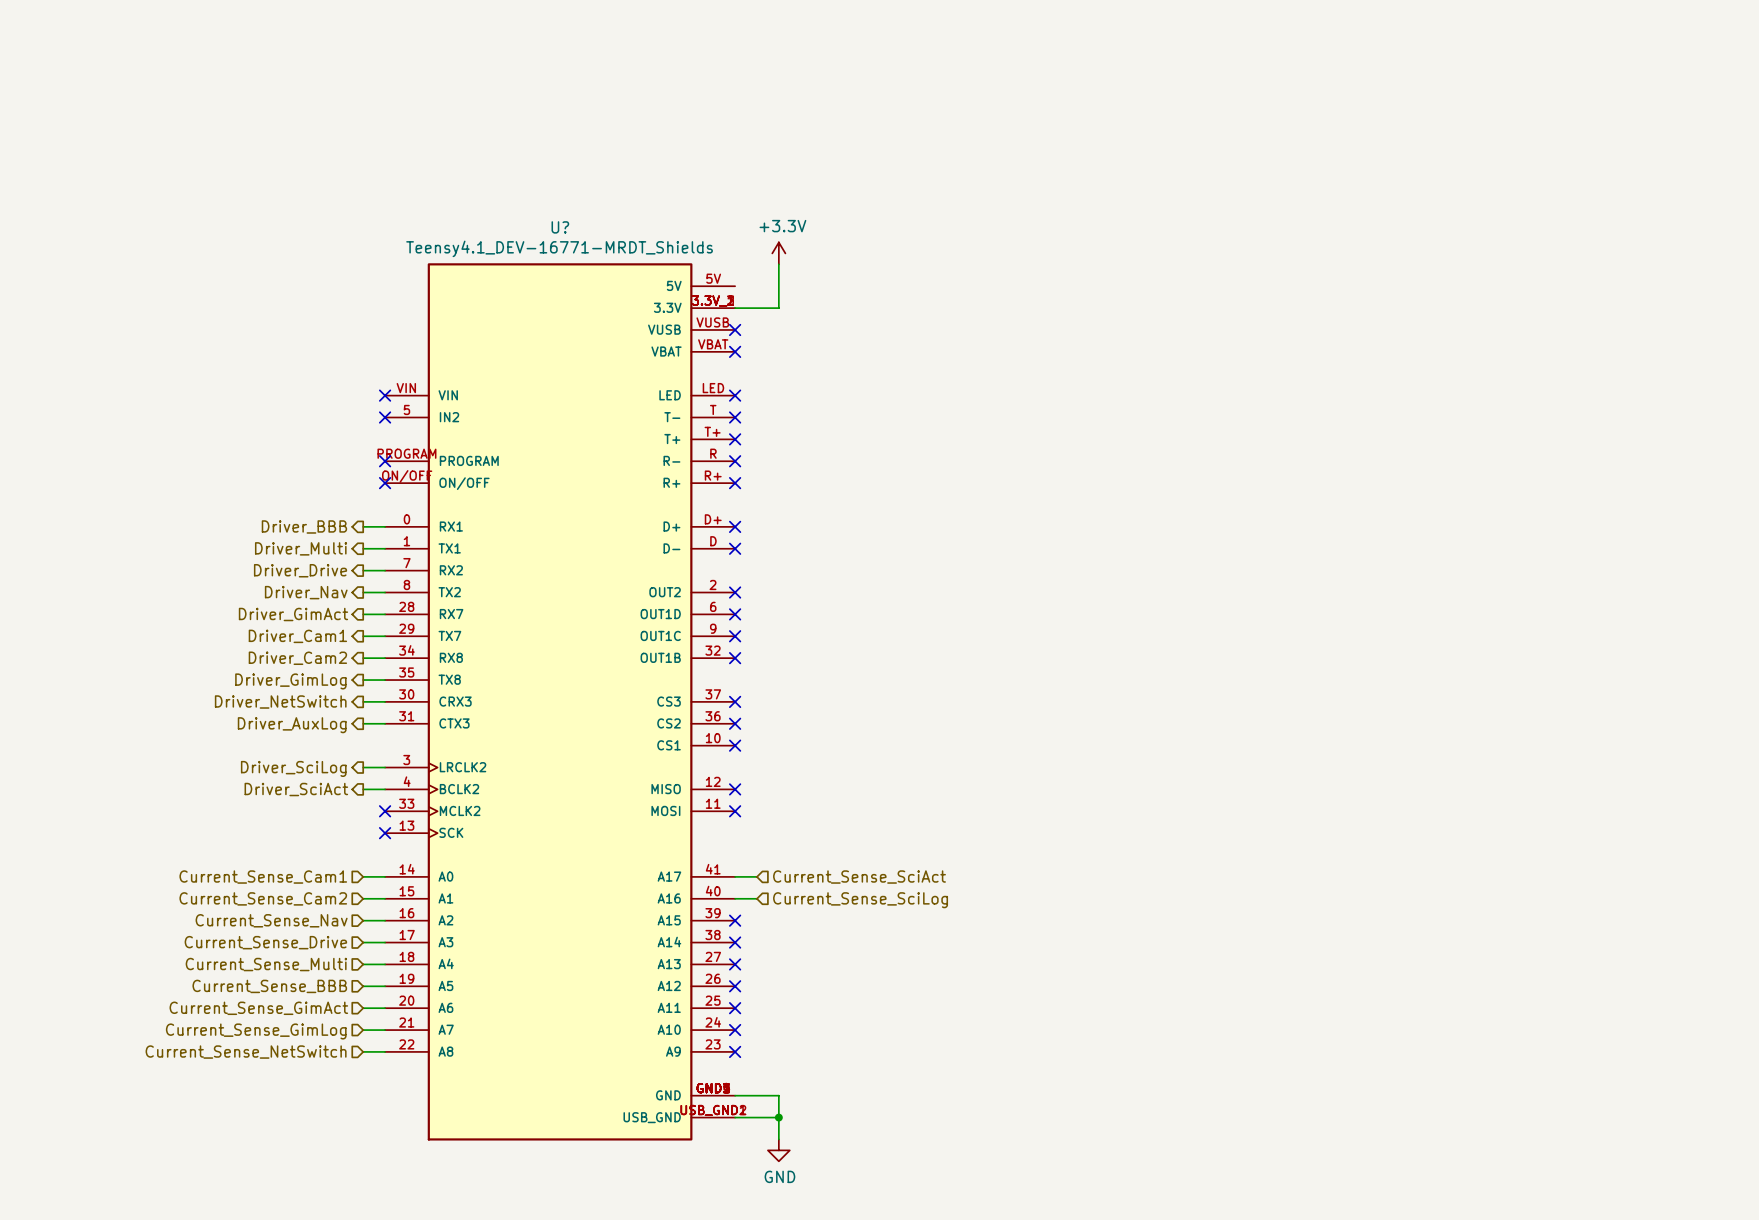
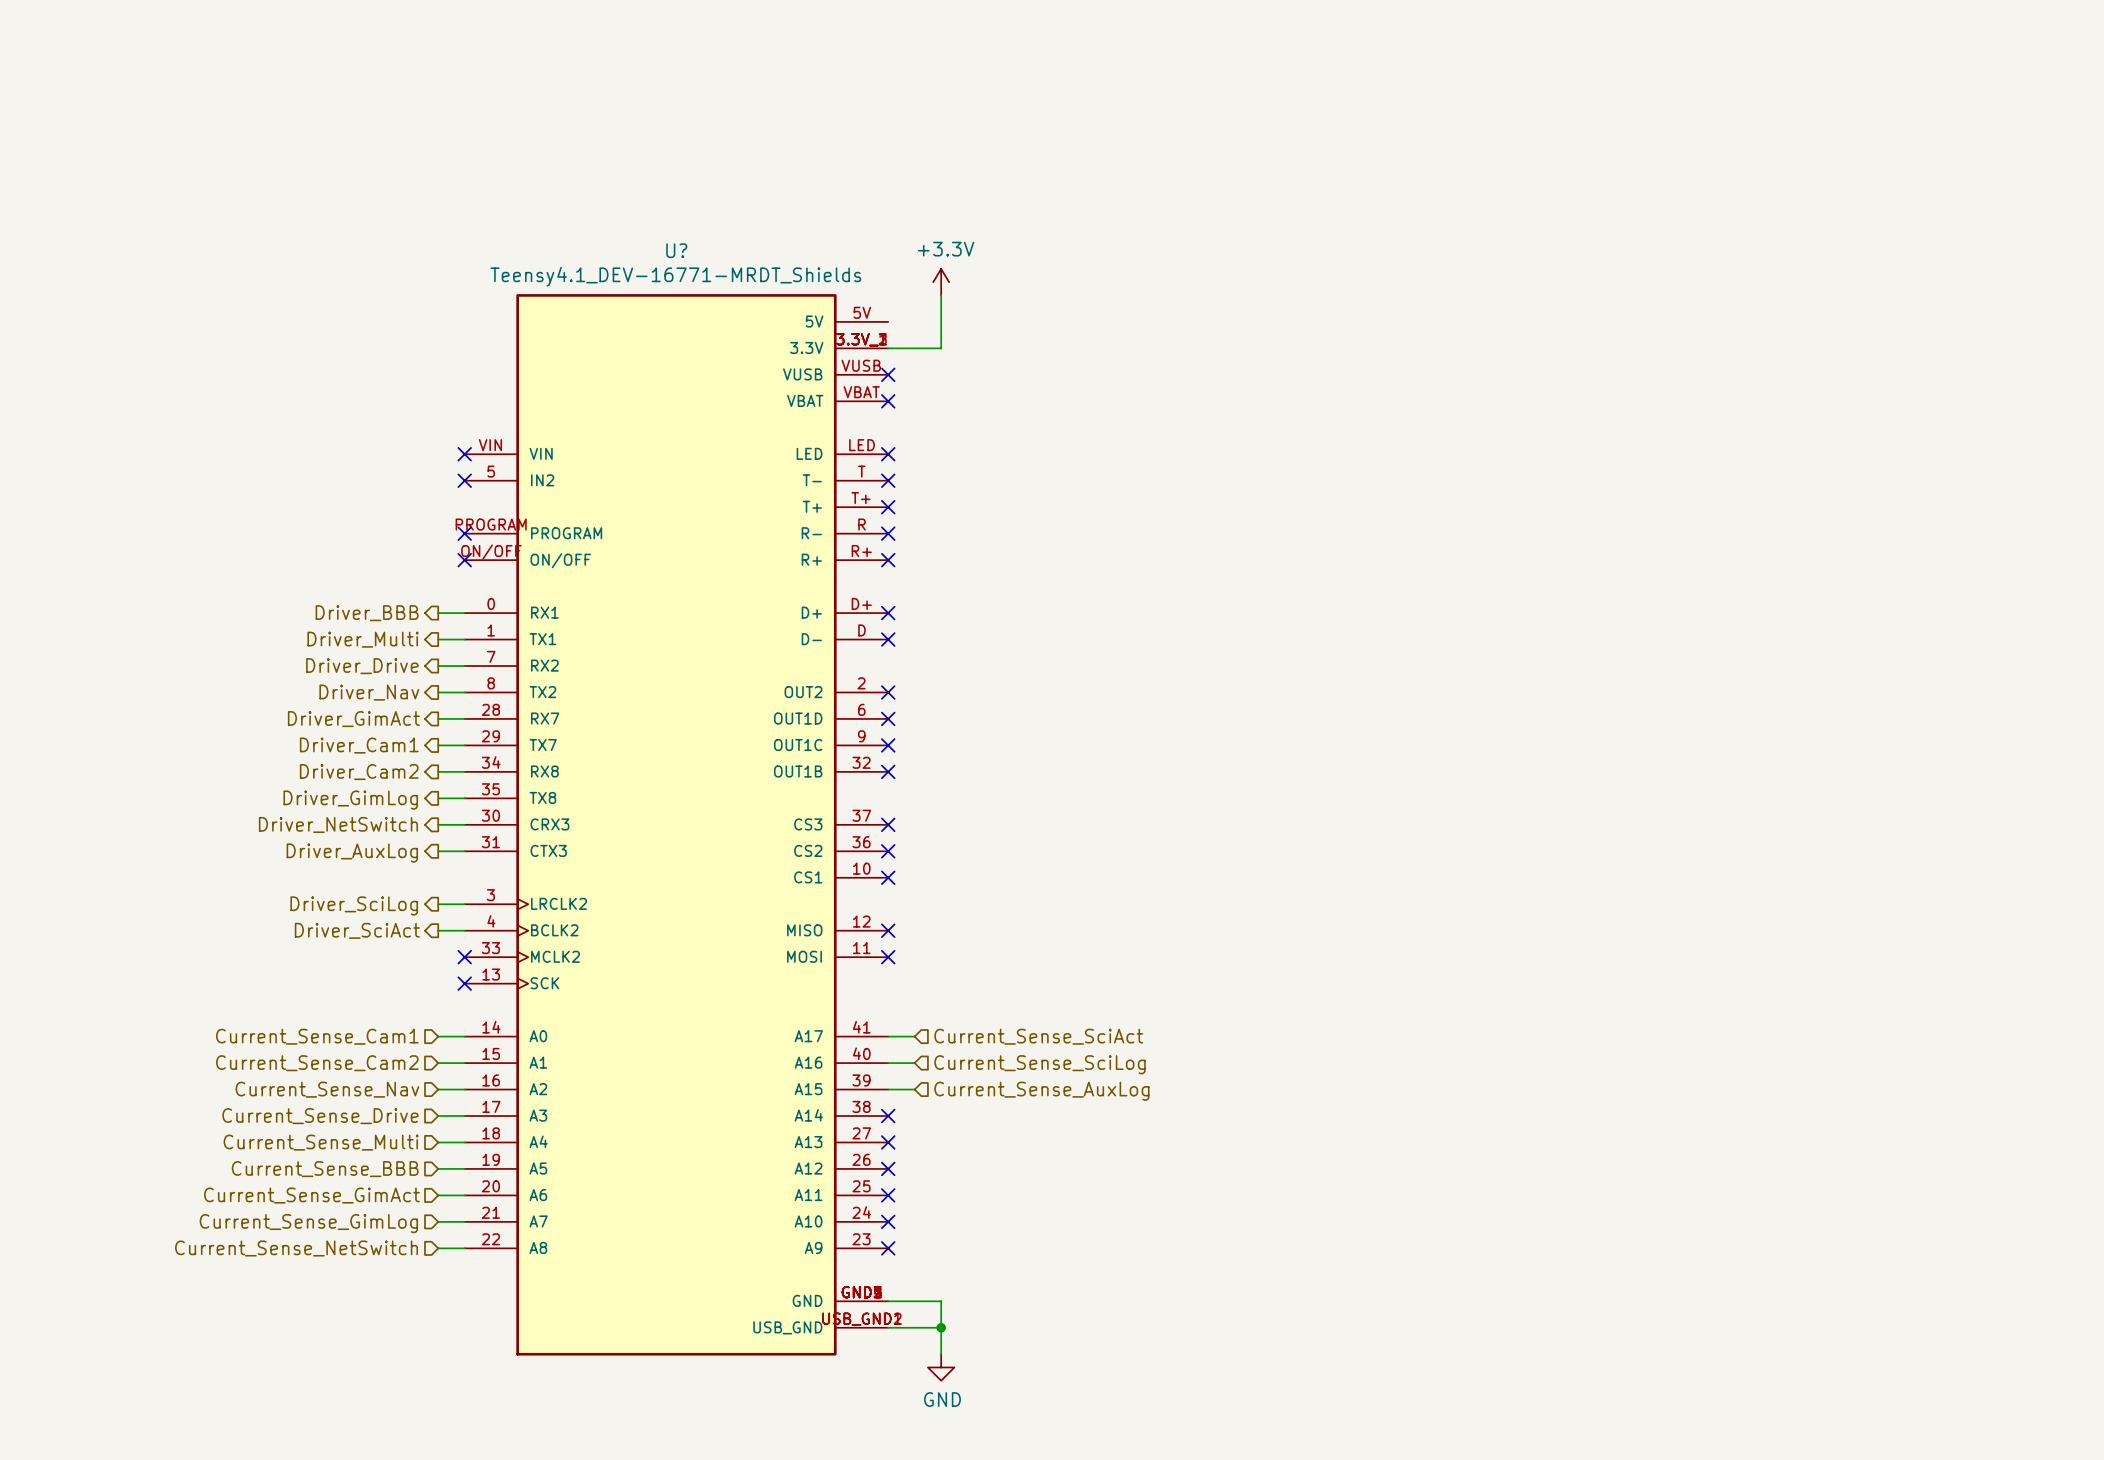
wire: none -> (888, 1089) (914, 1089)
no-connect mark: (735, 920) -> none
hierarchical label: none -> Current_Sense_AuxLog (1041, 1091)

